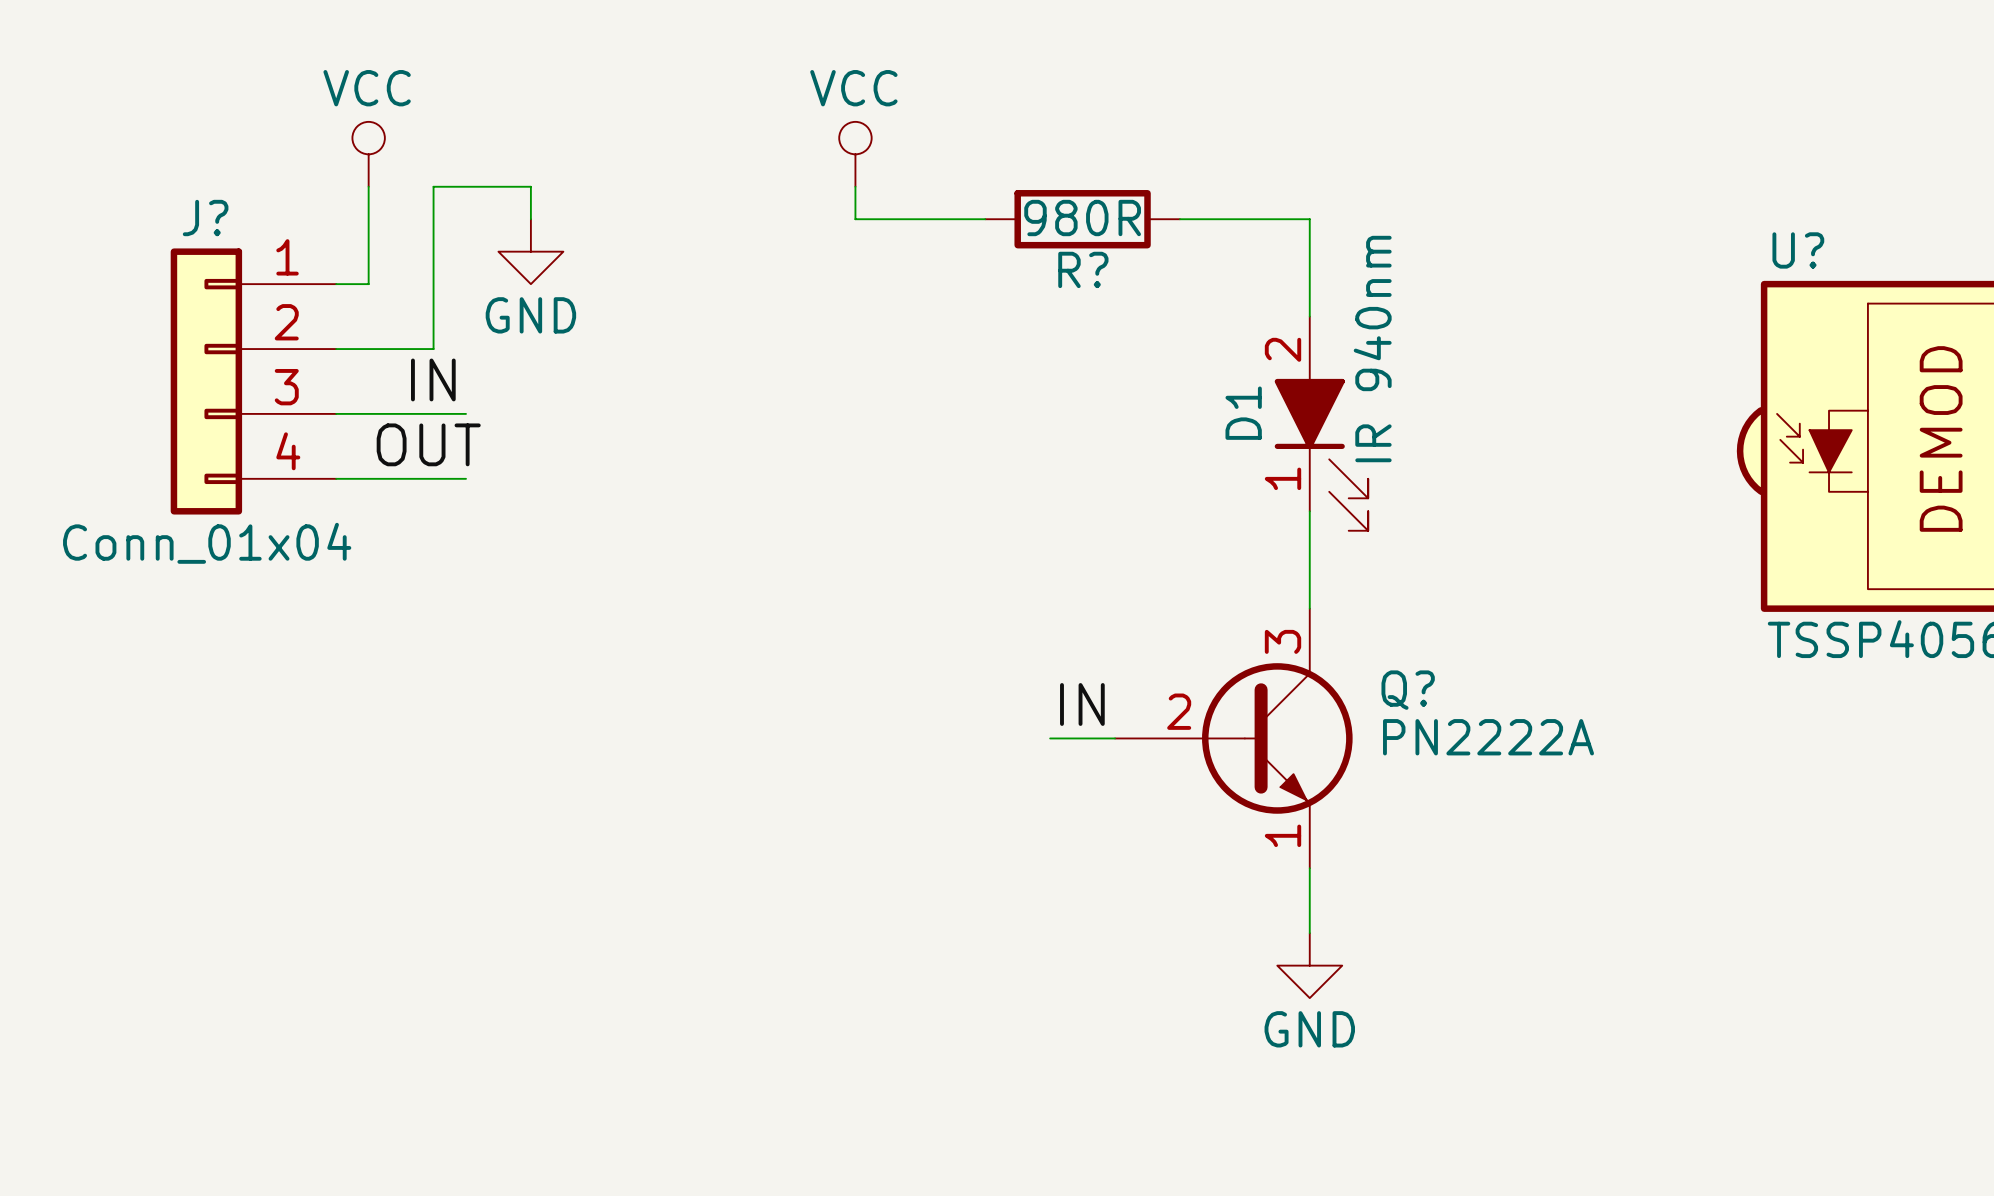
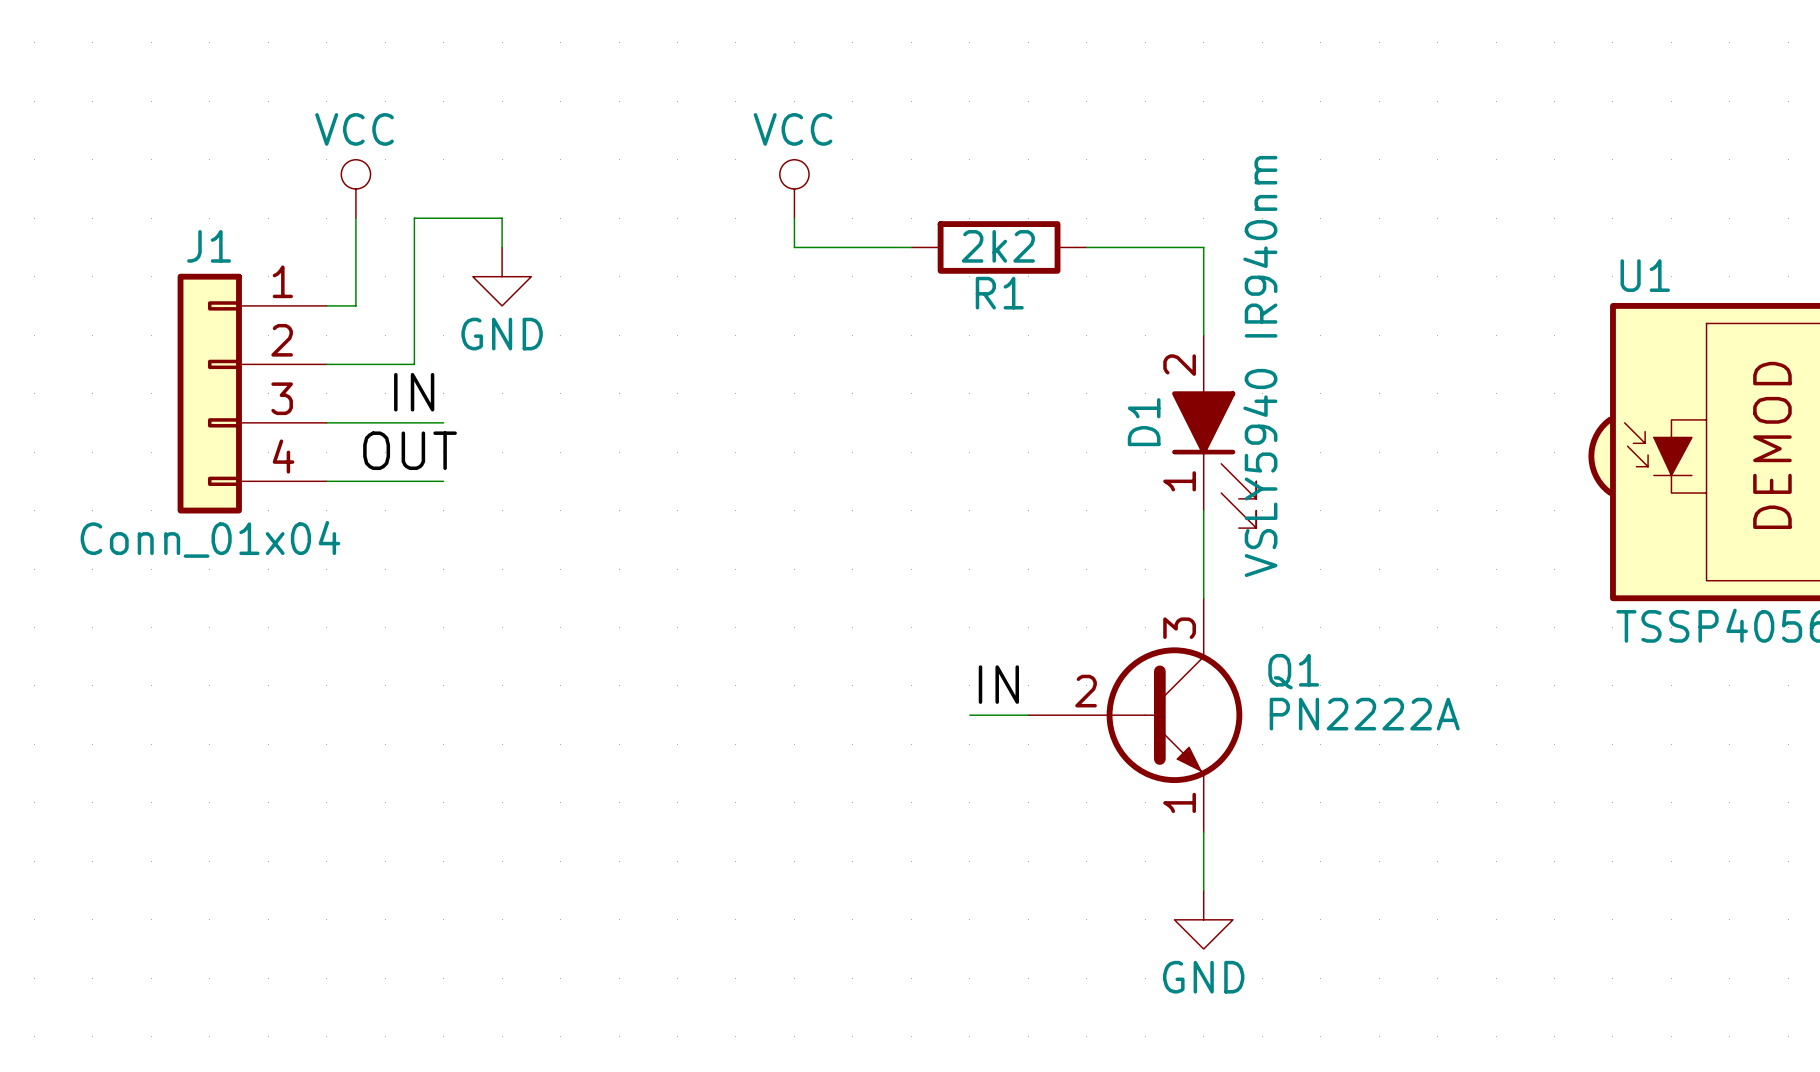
J? name: J? (205, 218) -> J1 (209, 246)
R? value: 980R (1082, 218) -> 2k2 (998, 246)
U? name: U? (1798, 250) -> U1 (1645, 275)
R? name: R? (1083, 269) -> R1 (999, 293)
D1 value: IR 940nm (1372, 349) -> VSLY5940 IR940nm (1260, 366)
Q? name: Q? (1408, 690) -> Q1 (1293, 671)

